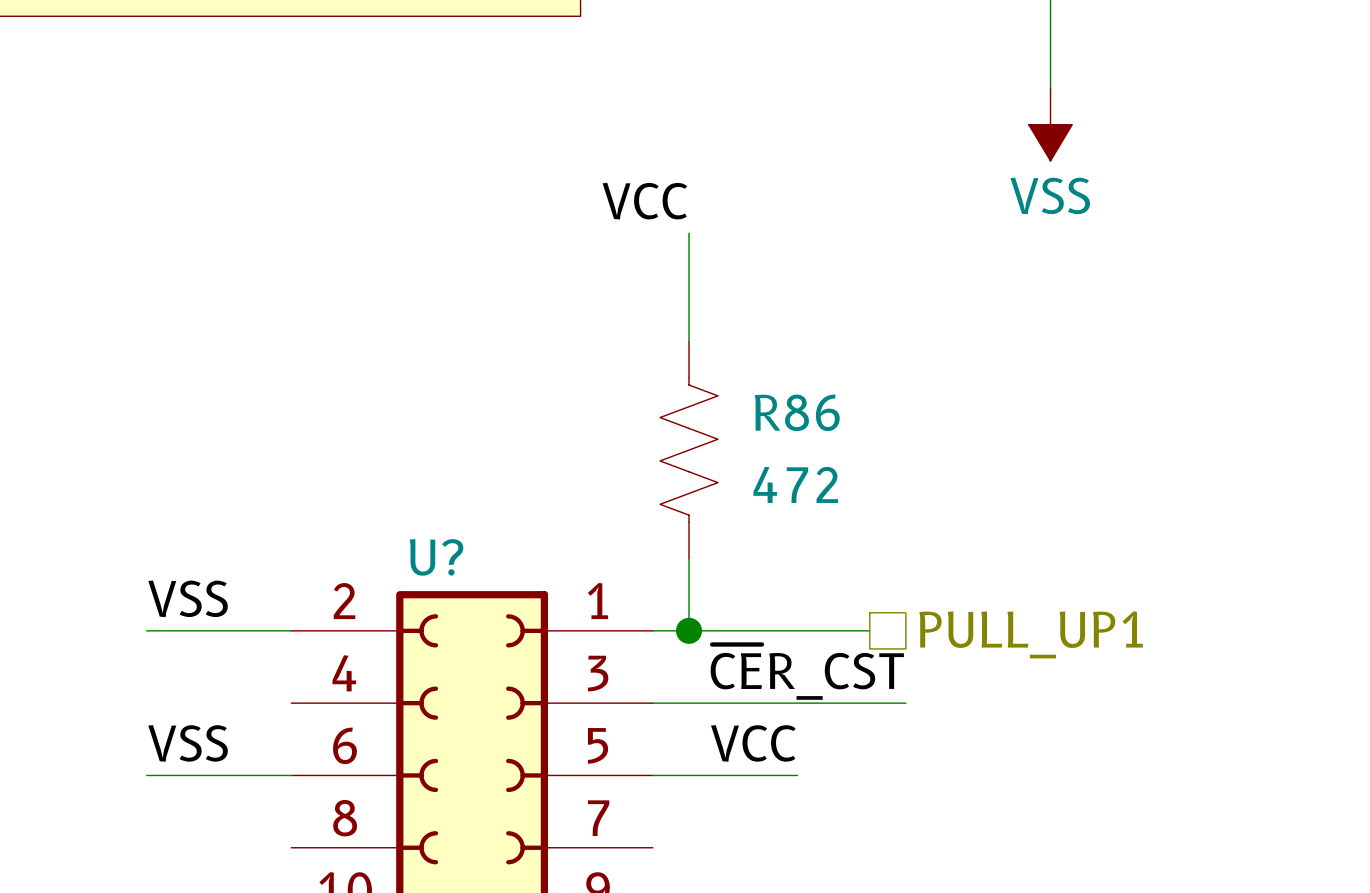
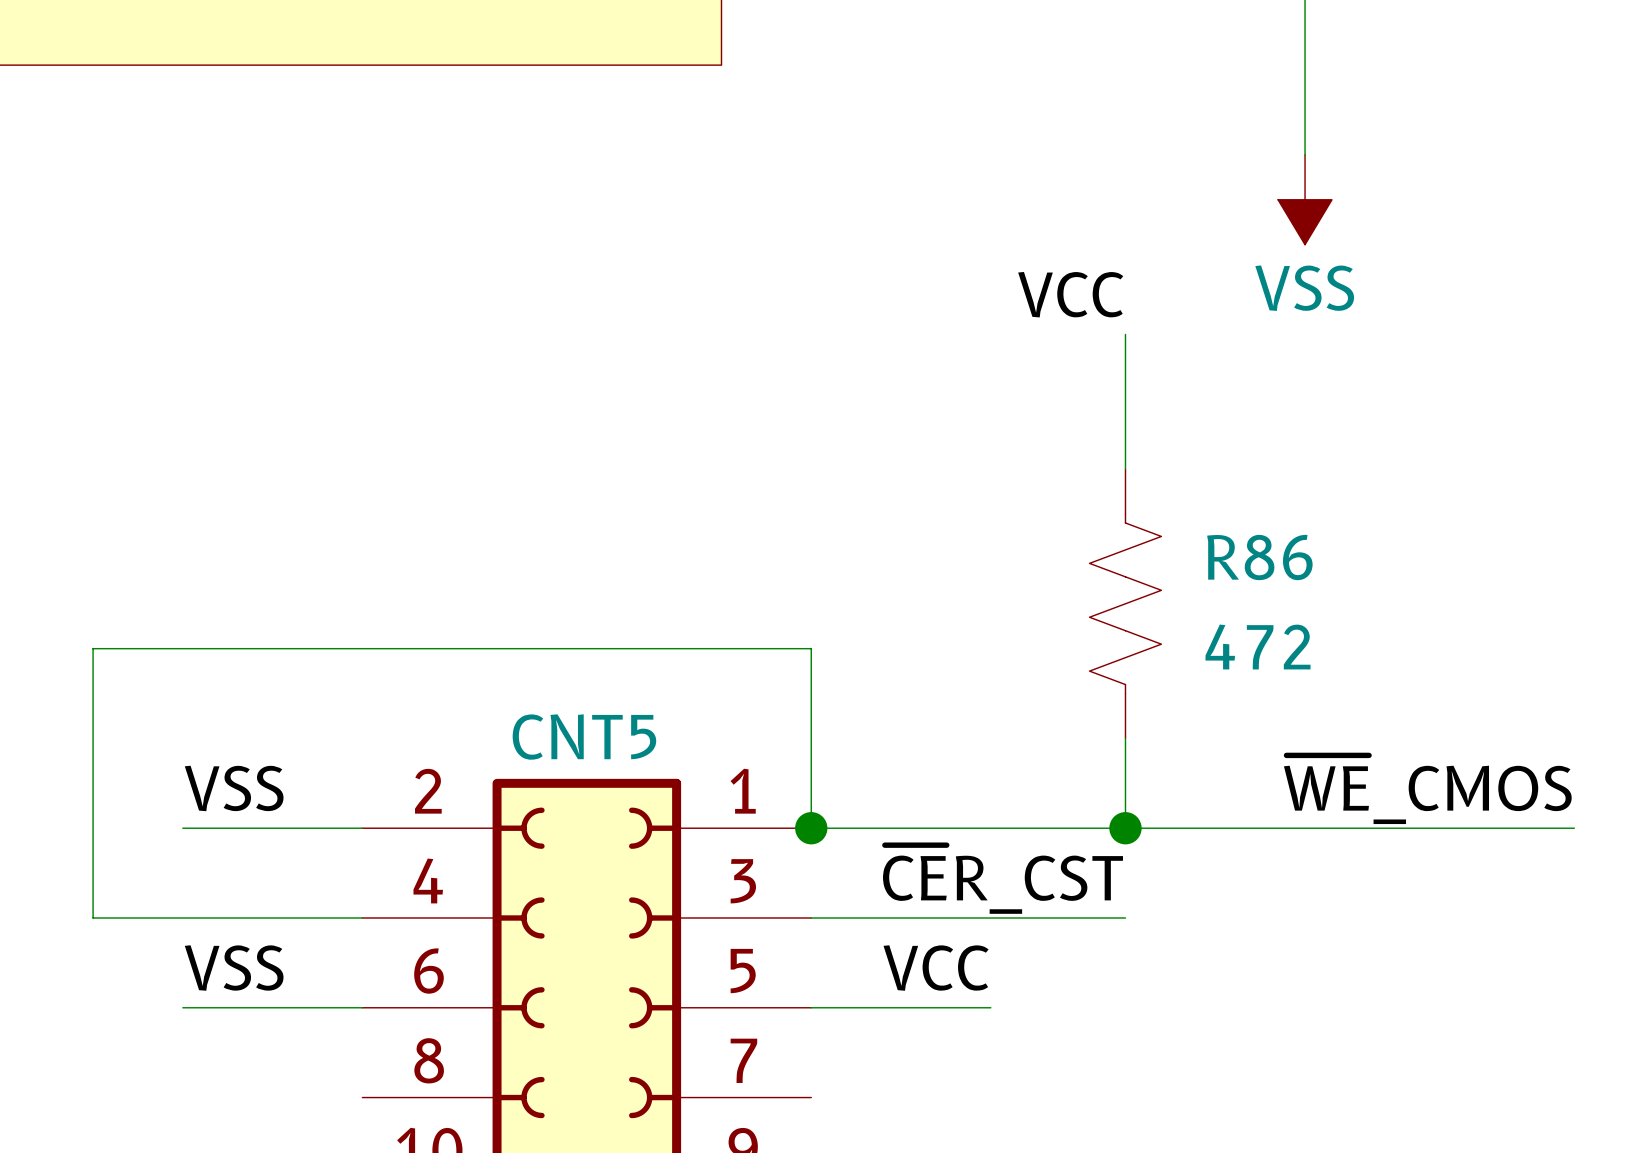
label position: VCC (644, 201) -> VCC (1070, 294)
wire: (689, 233) (689, 341) -> (1125, 334) (1125, 469)
R86 position: (689, 450) -> (1125, 603)
U? name: U? (436, 557) -> CNT5 (584, 737)
wire: (689, 558) (689, 630) -> (1125, 738) (1125, 828)
label: none -> ~{WE}_CMOS (1427, 789)
wire: none -> (811, 828) (811, 648) (93, 648) (93, 918) (362, 918)
junction position: (689, 630) -> (811, 828)
wire: none -> (1080, 828) (1574, 828)
junction: none -> (1125, 828)
hierarchical label: PULL_UP1 (1031, 634) -> none

